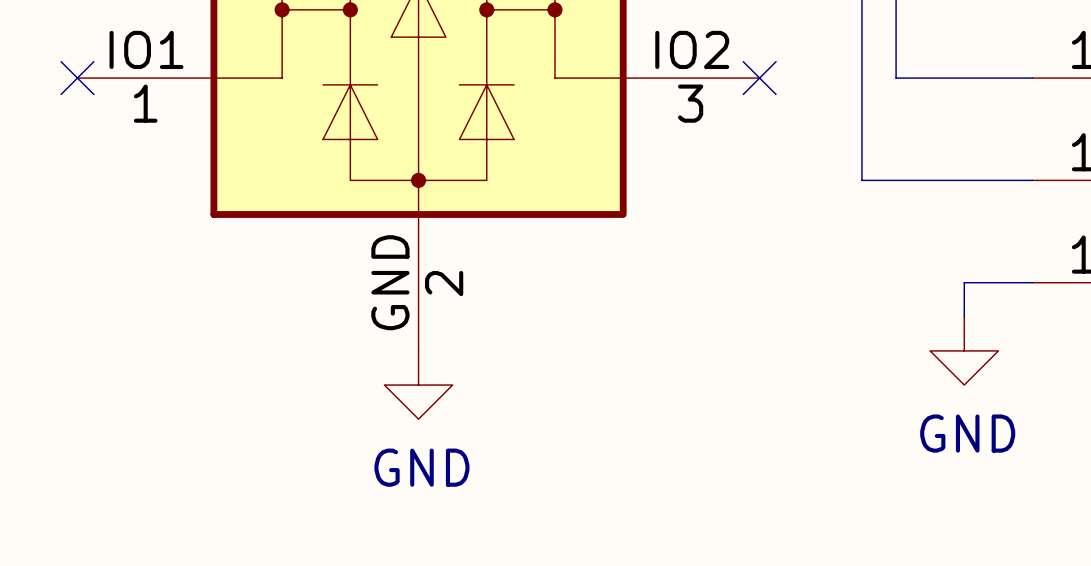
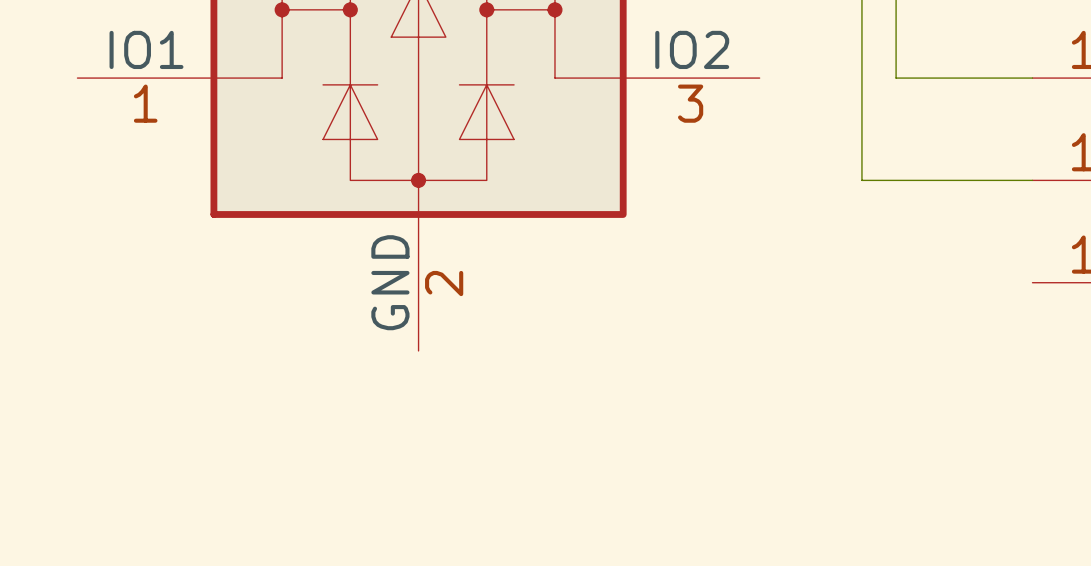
no-connect mark: (77, 78) -> none
no-connect mark: (759, 78) -> none
wire: (1032, 282) (964, 282) (964, 316) -> none
power symbol: GND (964, 350) -> none
power symbol: GND (418, 385) -> none

